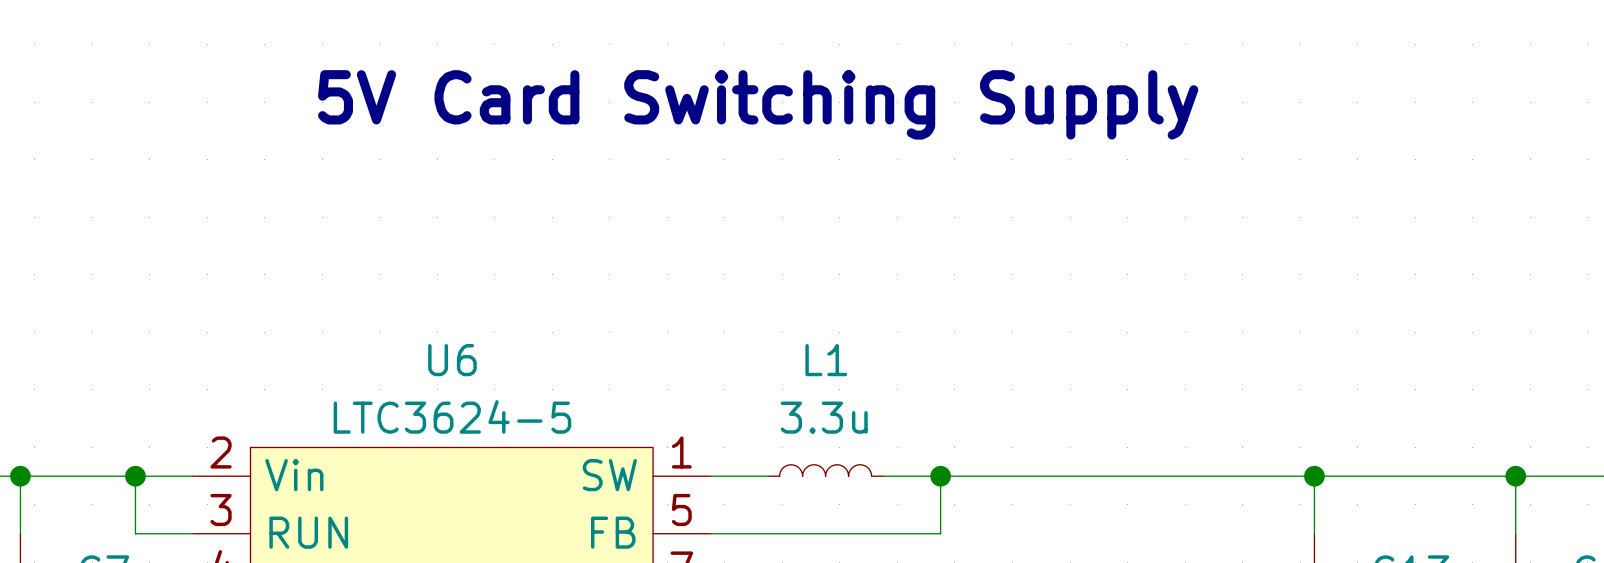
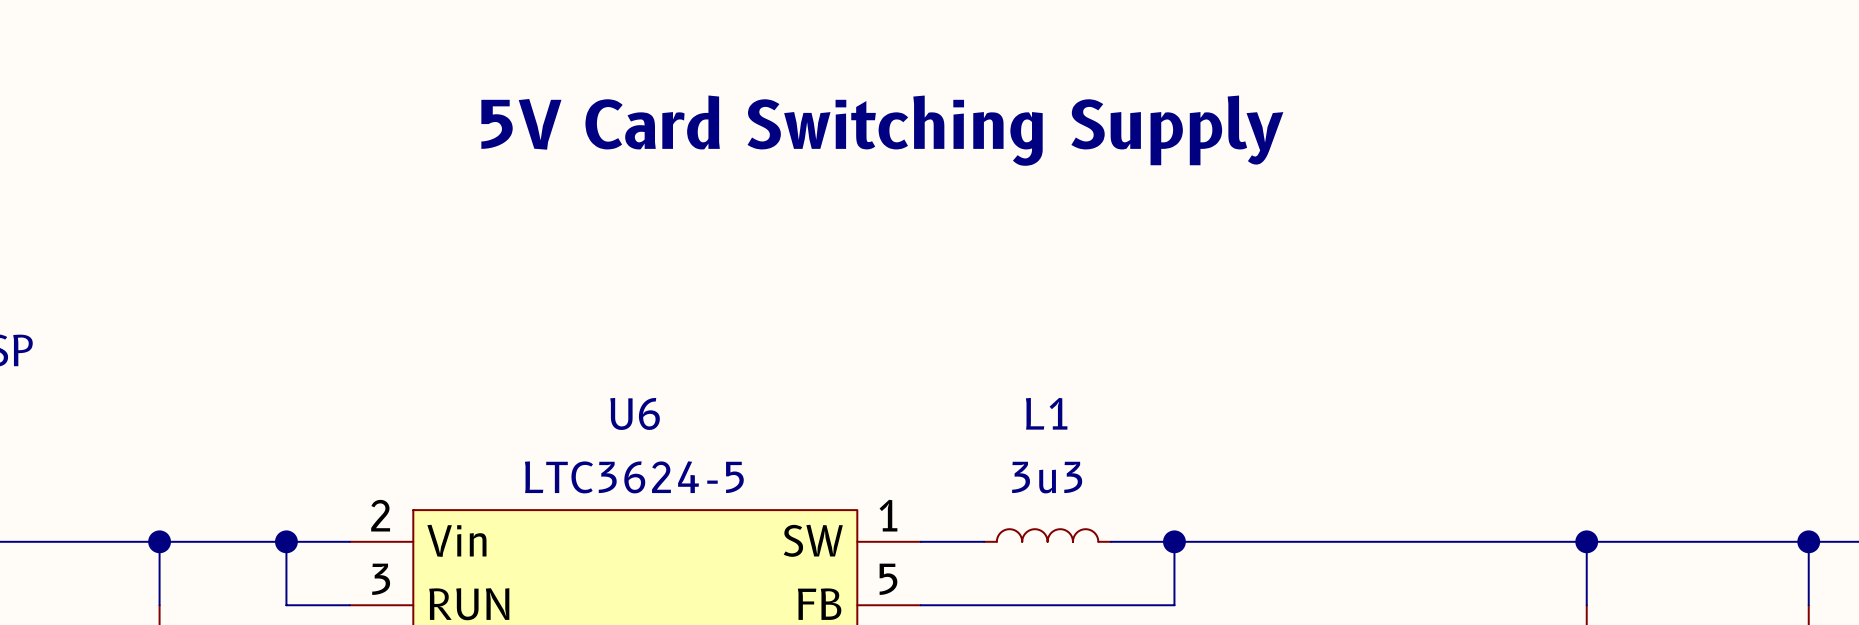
L1 value: 3.3u (824, 417) -> 3u3 (1047, 477)

